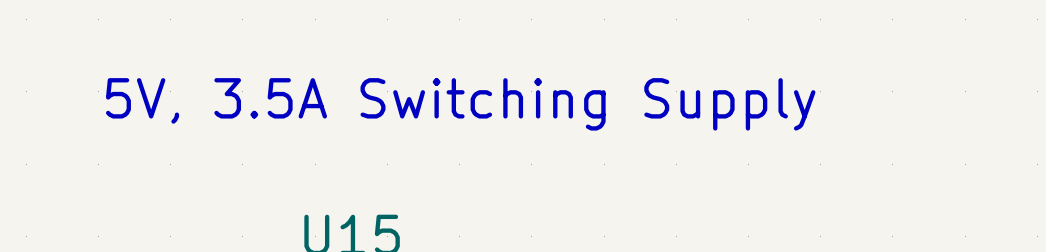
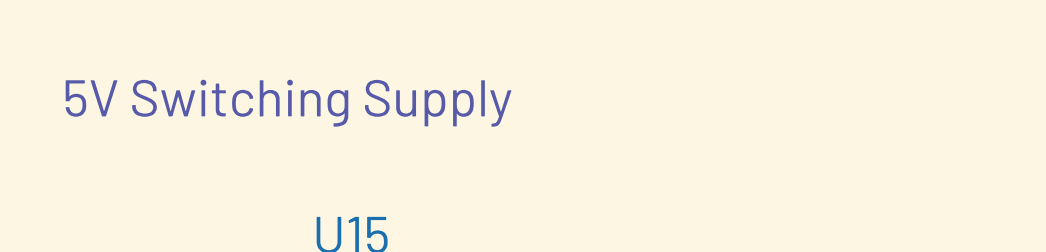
text: 5V, 3.5A Switching Supply (460, 104) -> 5V Switching Supply (288, 103)

